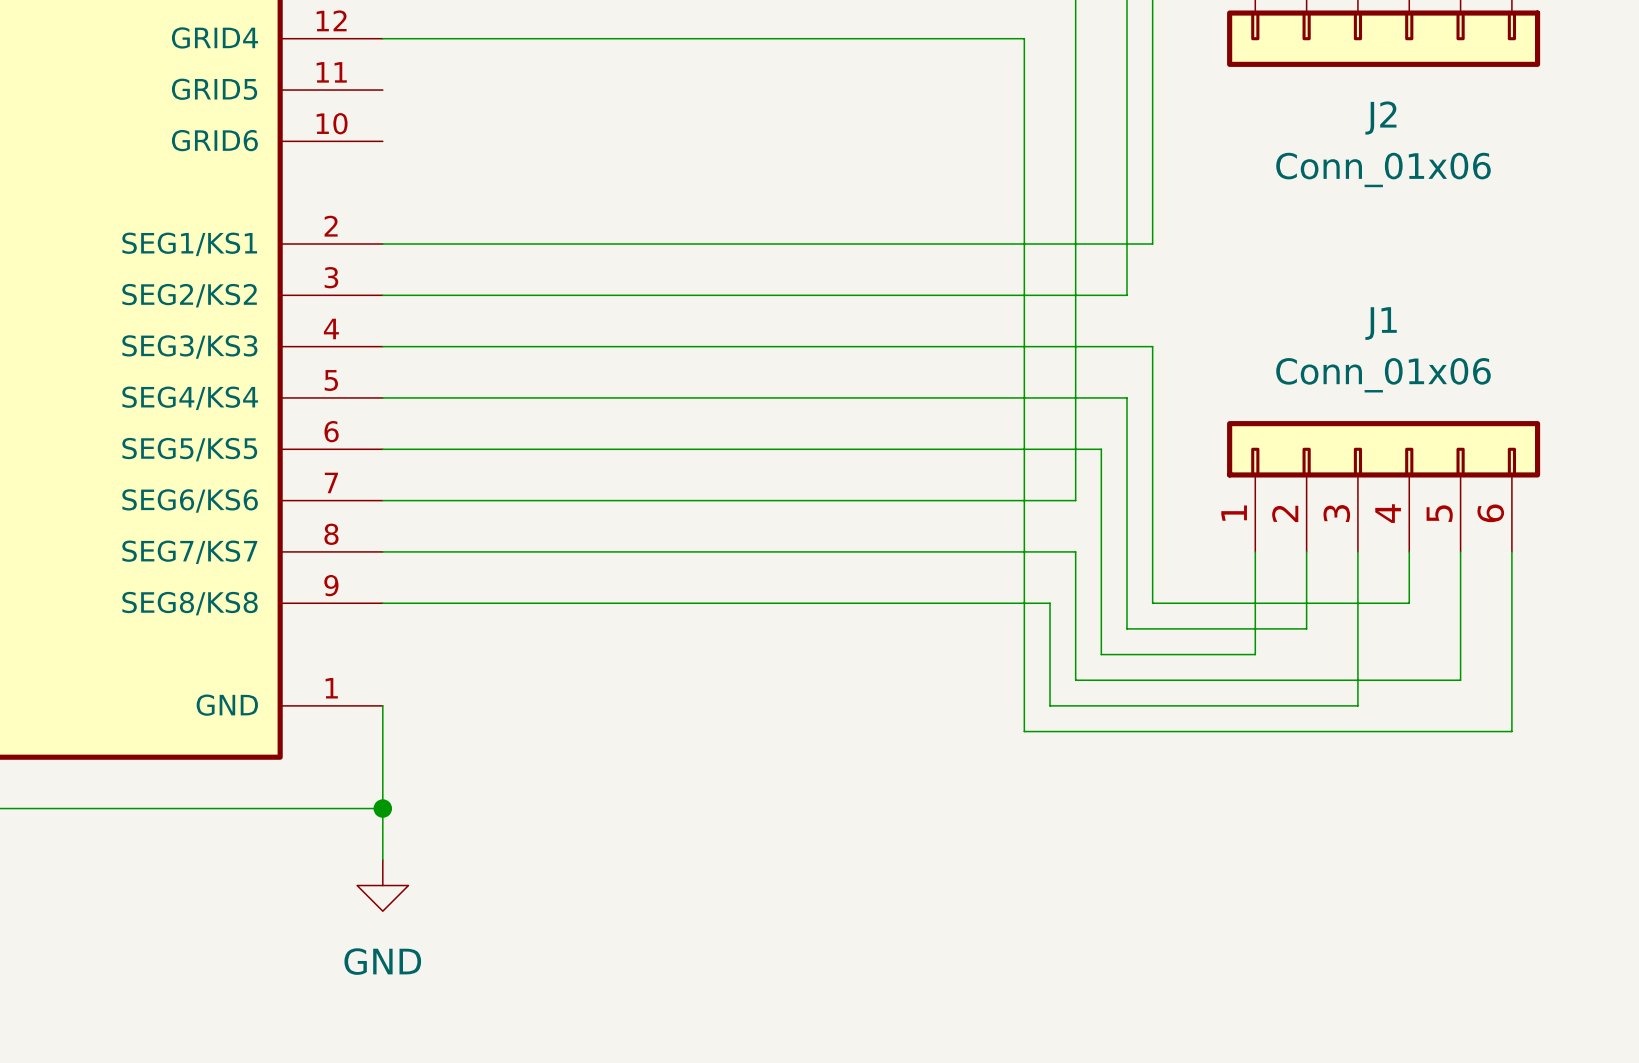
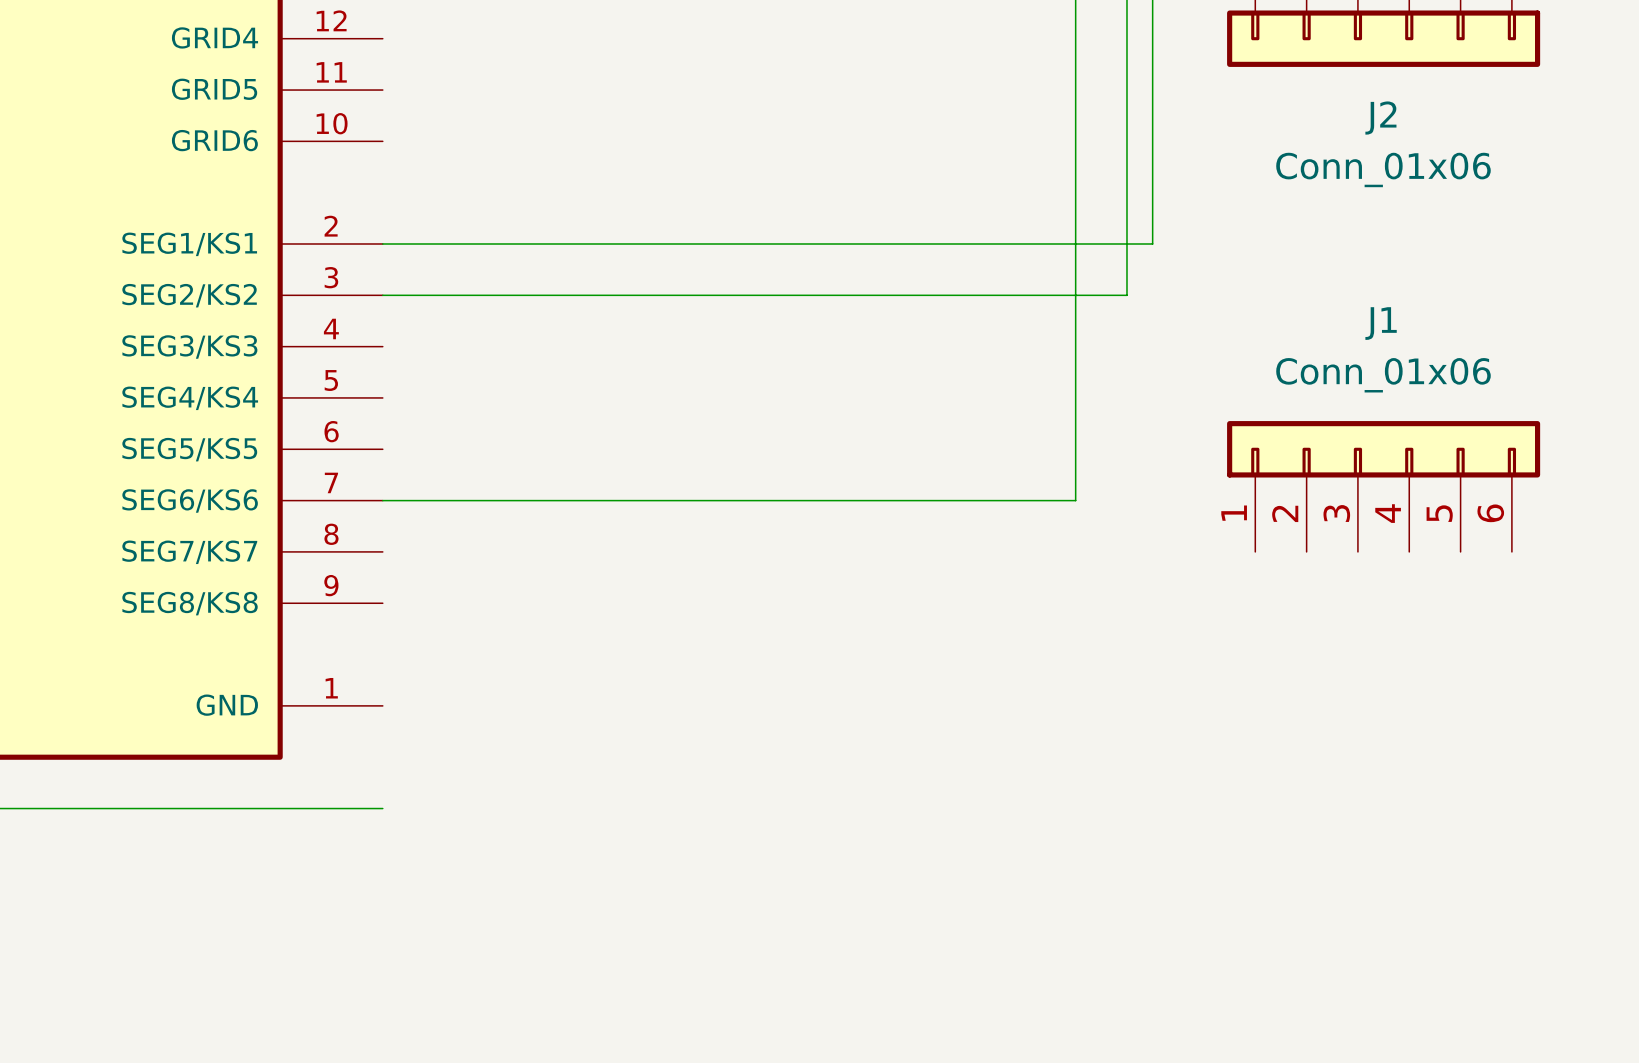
wire: (382, 38) (1024, 38) (1024, 731) (1511, 731) (1511, 551) -> none
wire: (382, 346) (1152, 346) (1152, 603) (1409, 603) (1409, 551) -> none
wire: (382, 397) (1126, 397) (1126, 628) (1306, 628) (1306, 551) -> none
wire: (382, 449) (1101, 449) (1101, 654) (1255, 654) (1255, 551) -> none
wire: (382, 551) (1075, 551) (1075, 680) (1460, 680) (1460, 551) -> none
wire: (1357, 551) (1357, 705) (1050, 705) (1050, 603) (382, 603) -> none
wire: (382, 705) (382, 859) -> none
junction: (382, 808) -> none
power symbol: GND (382, 885) -> none

